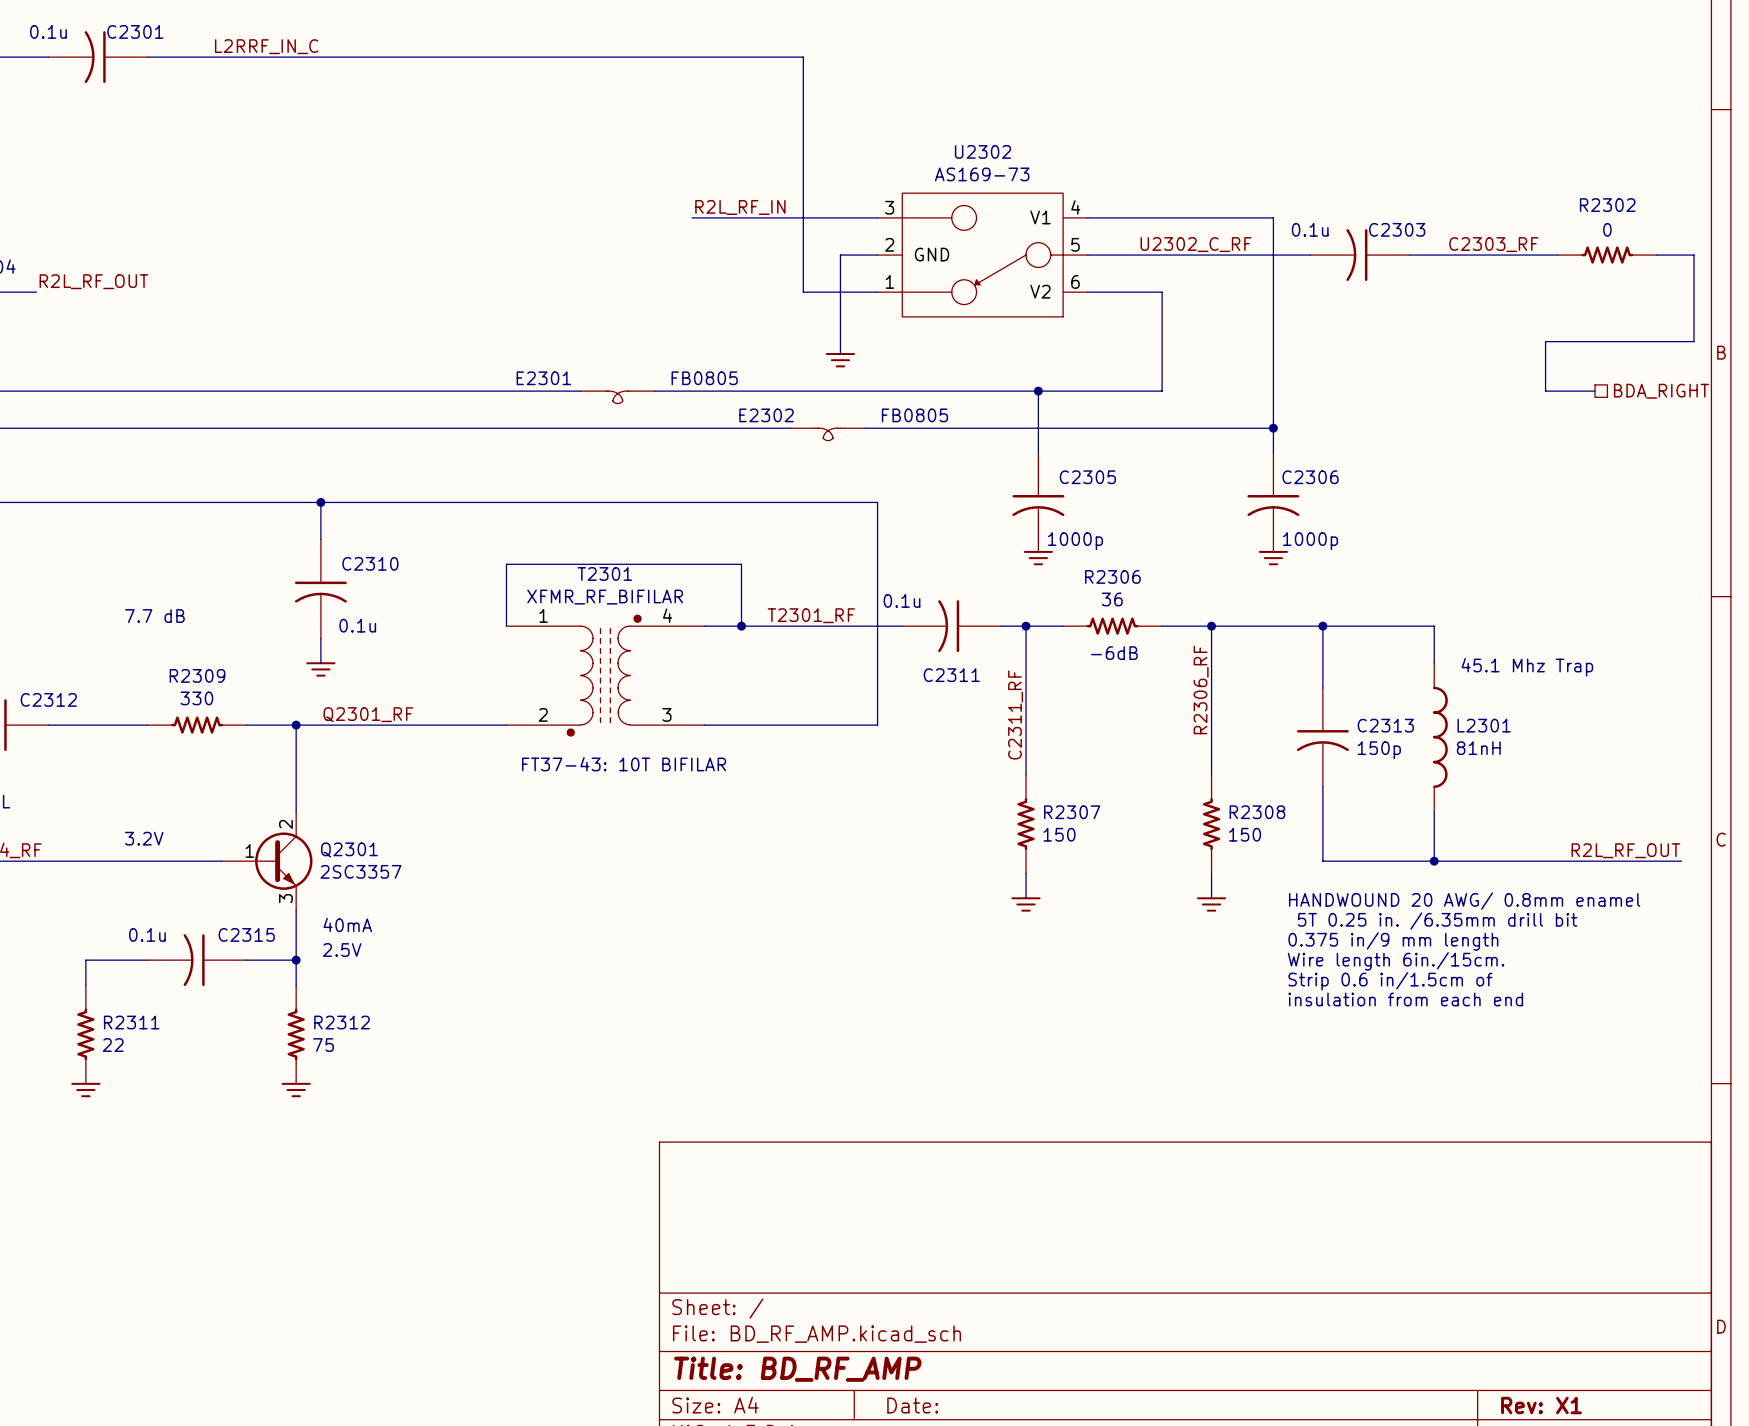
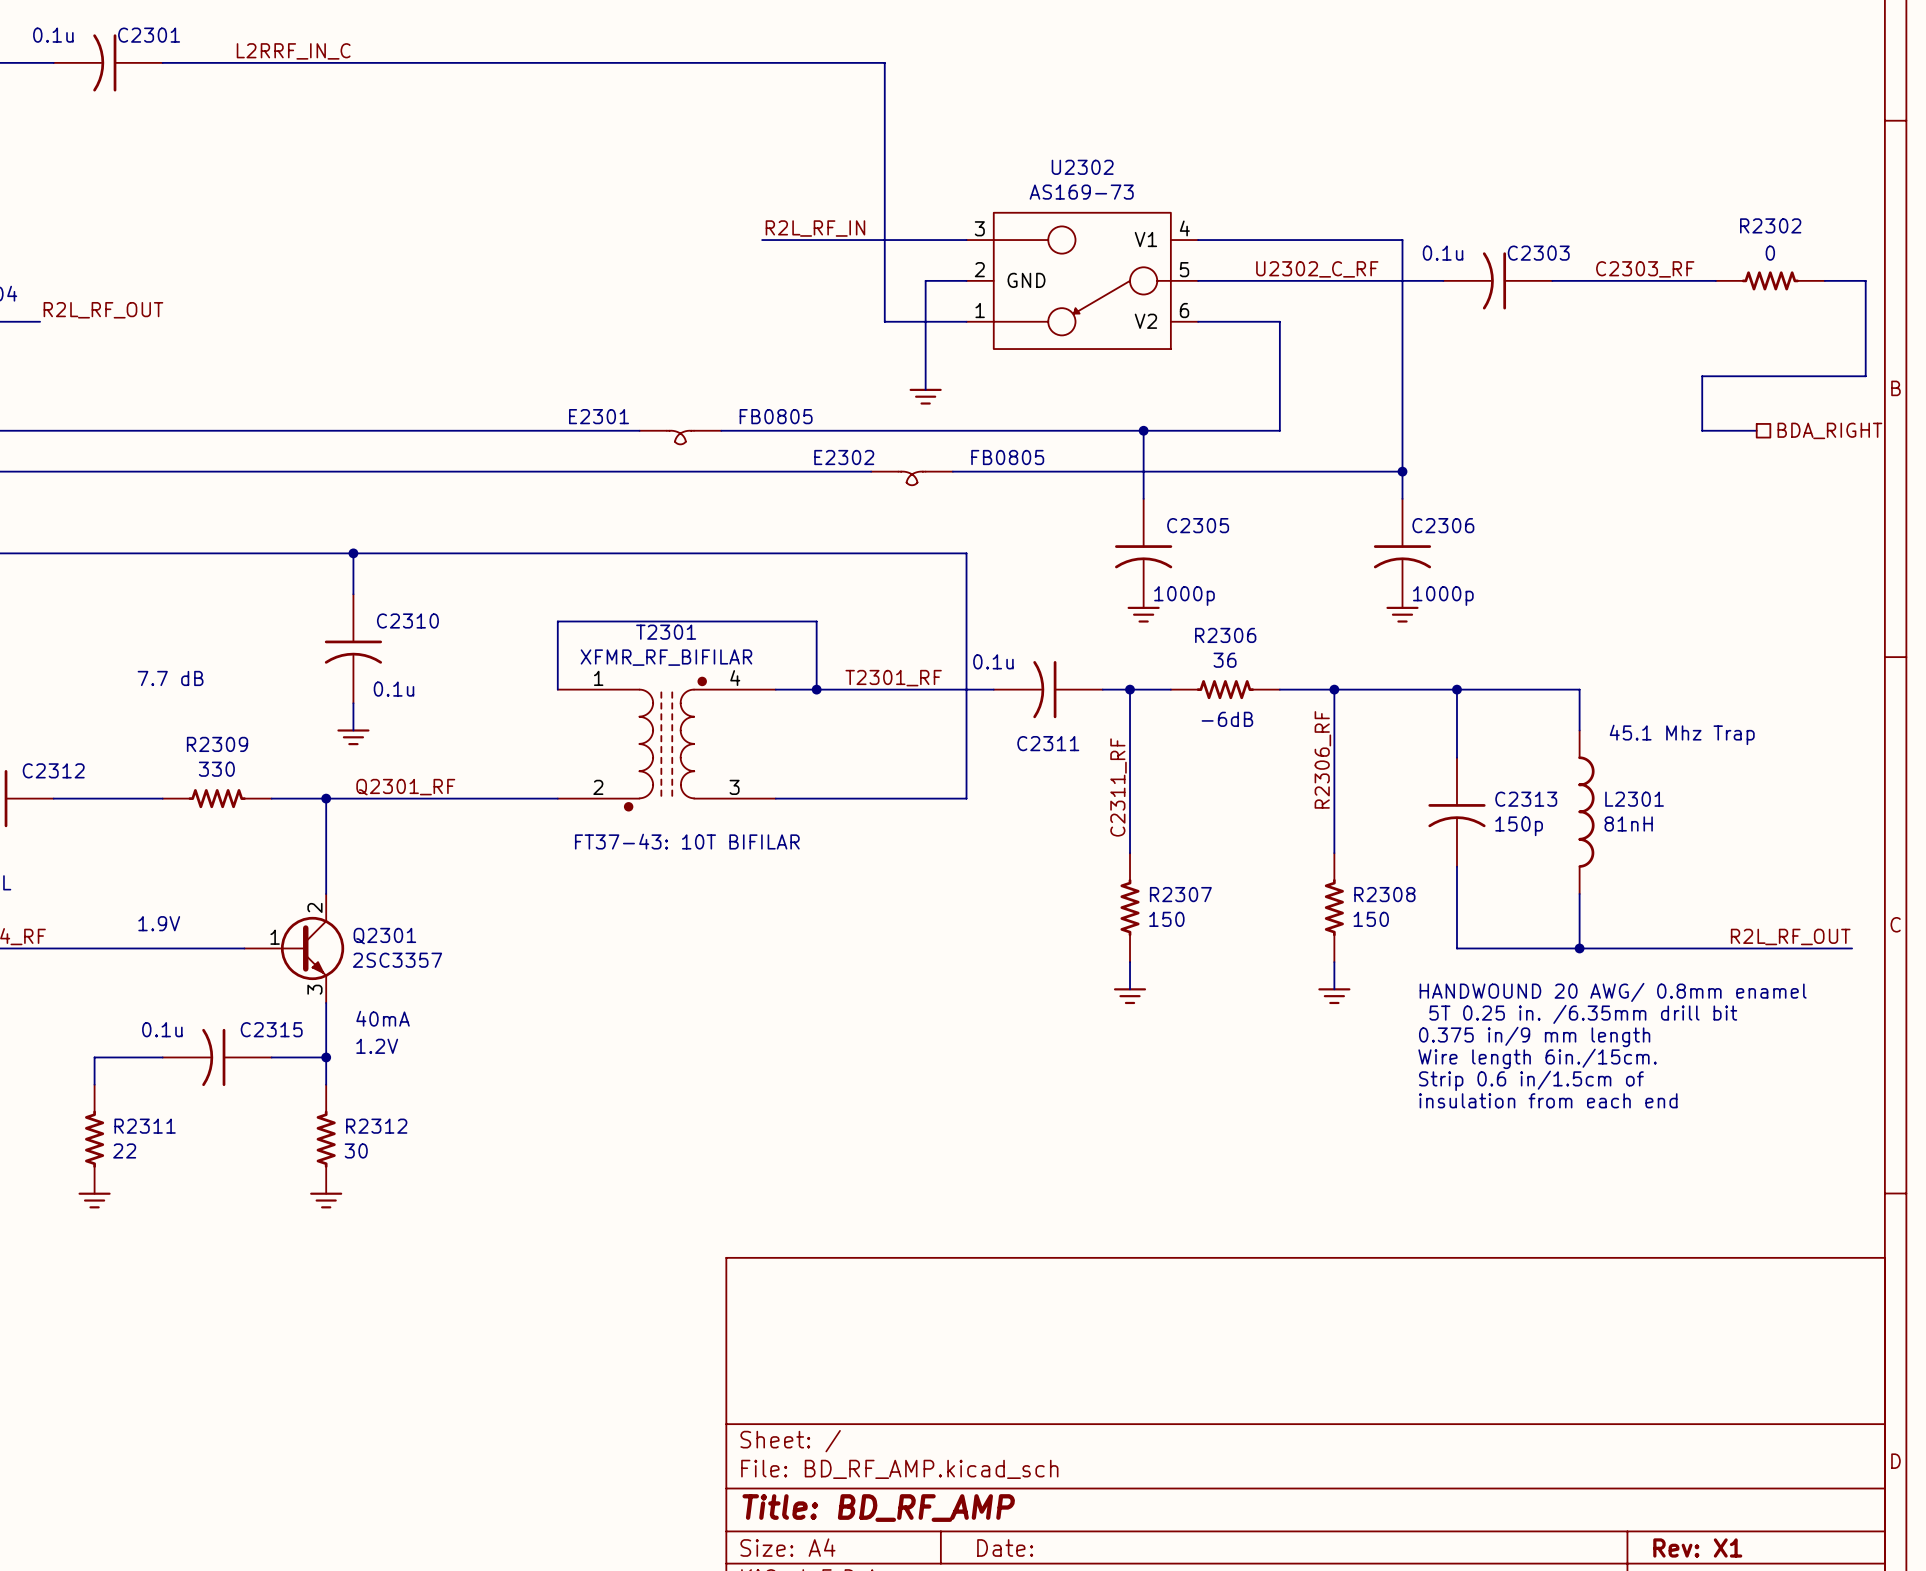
text: 3.2V (144, 838) -> 1.9V (159, 923)
text: 2.5V (342, 950) -> 1.2V (377, 1046)
R2312 value: 75 (323, 1045) -> 30 (356, 1150)

